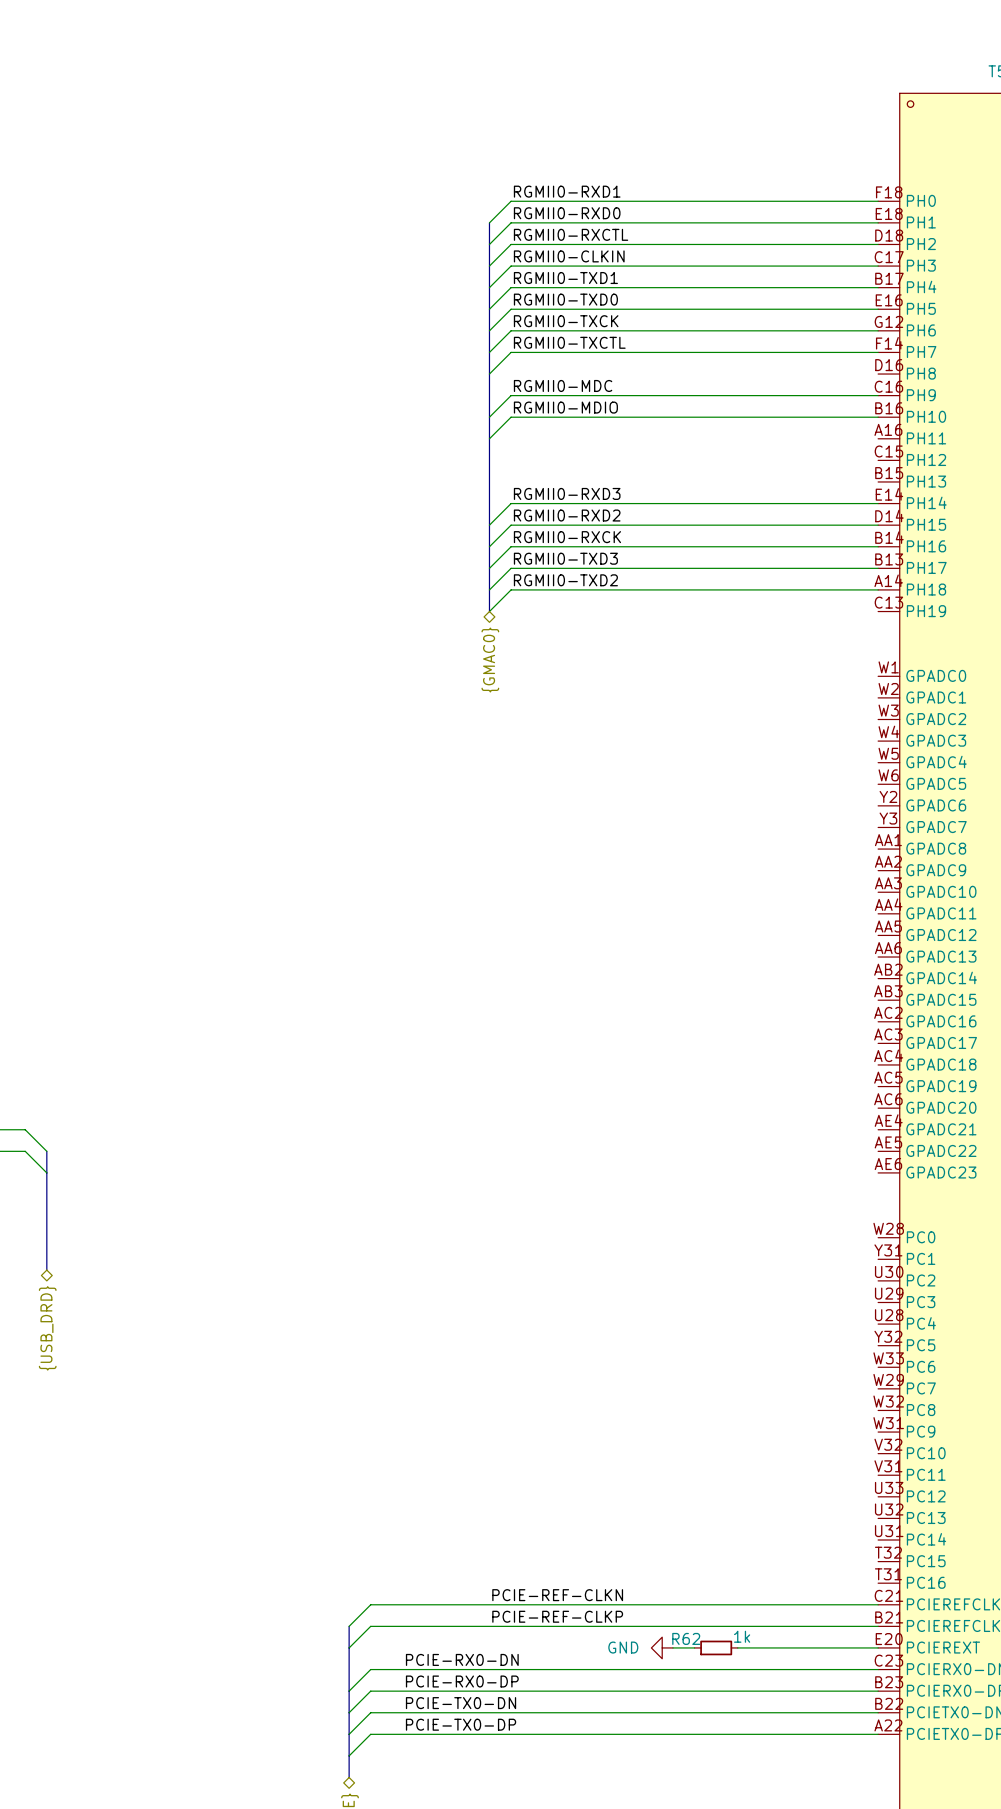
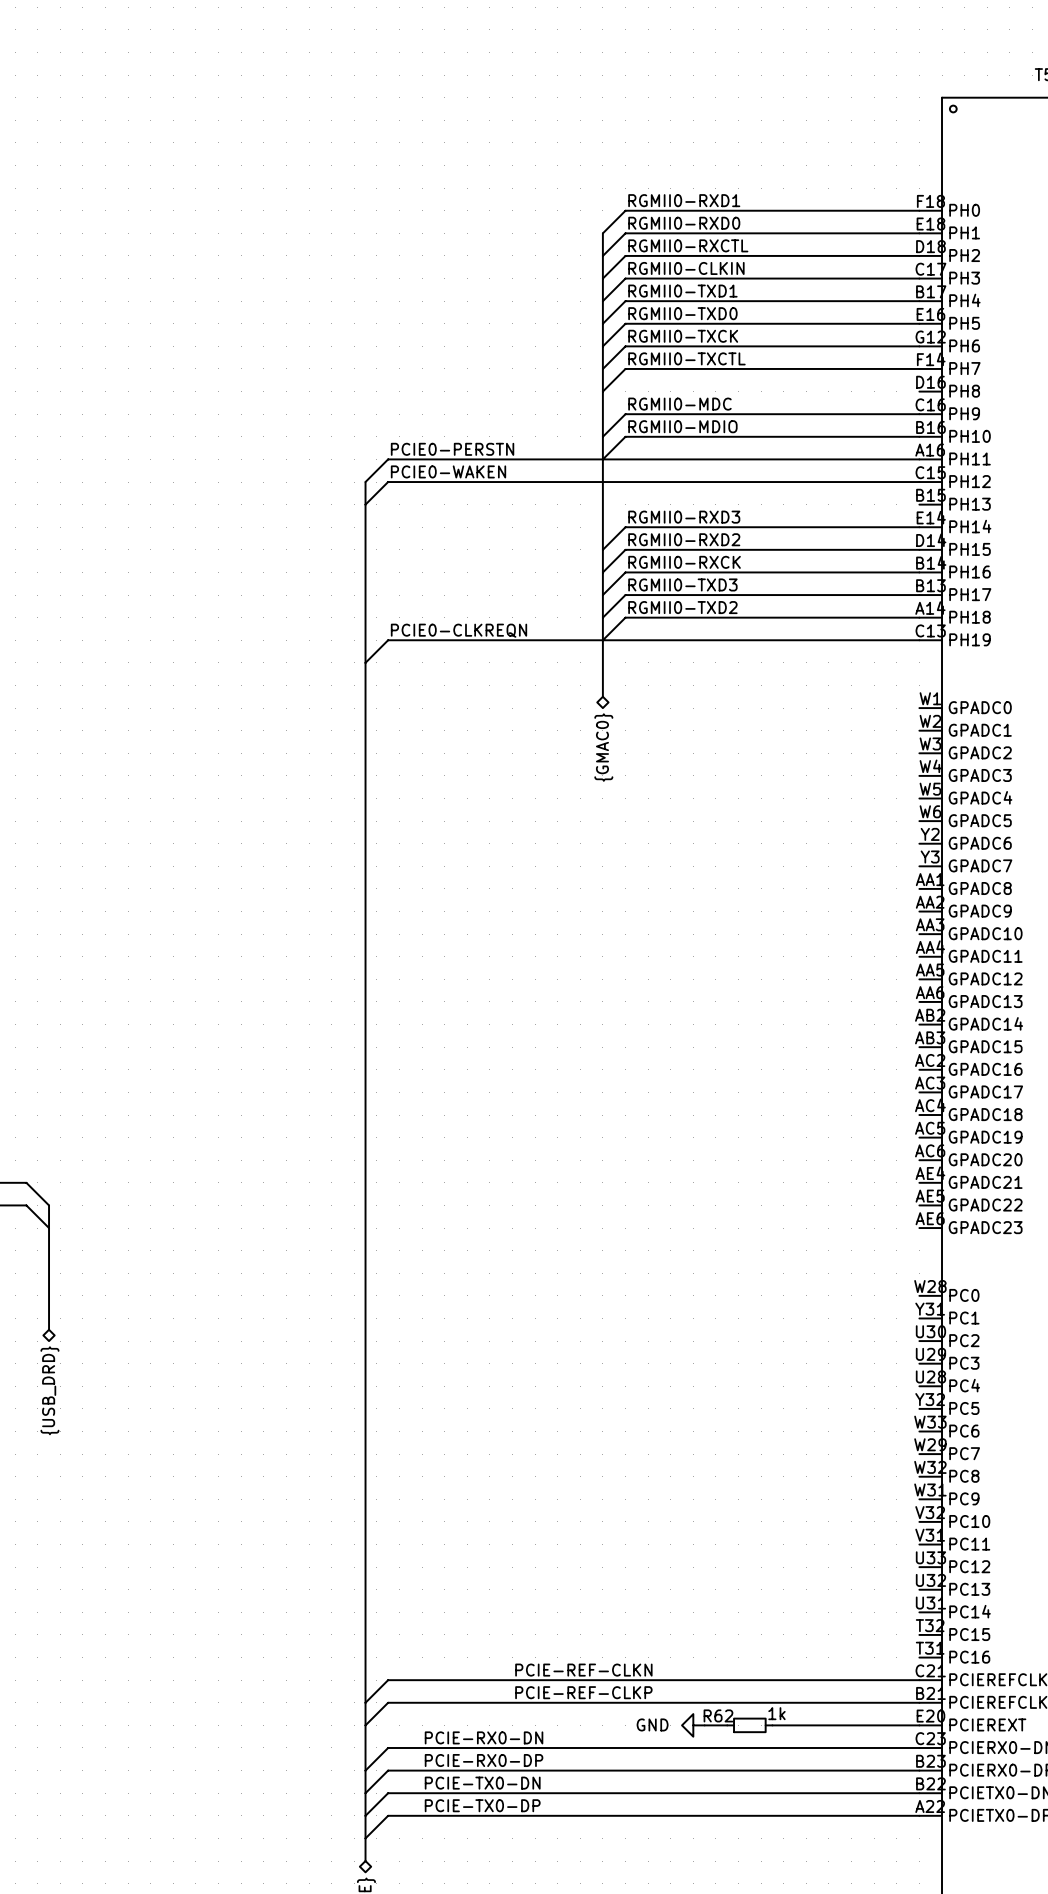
label position: RGMII0-RXD1 (567, 191) -> RGMII0-RXD1 (684, 200)
wire: (597, 201) (511, 201) (489, 222) -> (625, 210) (602, 233)
label position: RGMII0-RXD0 (567, 213) -> RGMII0-RXD0 (684, 223)
bus: (489, 222) (489, 611) -> none
bus: none -> (602, 233) (602, 696)
wire: (597, 222) (511, 222) (489, 244) -> (625, 233) (602, 255)
label position: RGMII0-RXCTL (571, 234) -> RGMII0-RXCTL (688, 245)
wire: (597, 244) (511, 244) (489, 266) -> (625, 255) (602, 278)
label position: RGMII0-CLKIN (569, 256) -> RGMII0-CLKIN (686, 268)
wire: (597, 266) (511, 266) (489, 287) -> (625, 278) (602, 301)
label position: RGMII0-TXD1 (565, 278) -> RGMII0-TXD1 (682, 291)
wire: (597, 287) (511, 287) (489, 309) -> (625, 301) (602, 323)
label position: RGMII0-TXD0 (565, 299) -> RGMII0-TXD0 (682, 313)
wire: (597, 309) (511, 309) (489, 330) -> (625, 323) (602, 346)
label position: RGMII0-TXCK (566, 321) -> RGMII0-TXCK (683, 336)
wire: (597, 330) (511, 330) (489, 352) -> (625, 346) (602, 368)
label position: RGMII0-TXCTL (569, 342) -> RGMII0-TXCTL (686, 358)
wire: (597, 352) (511, 352) (489, 374) -> (625, 368) (602, 391)
label position: RGMII0-MDC (563, 385) -> RGMII0-MDC (679, 404)
wire: (597, 395) (511, 395) (489, 417) -> (625, 414) (602, 436)
label position: RGMII0-MDIO (565, 407) -> RGMII0-MDIO (682, 426)
wire: (597, 417) (511, 417) (489, 438) -> (625, 436) (602, 459)
label: none -> PCIE0-PERSTN (452, 449)
wire: none -> (919, 459) (388, 459) (365, 482)
label: none -> PCIE0-WAKEN (448, 471)
bus: none -> (365, 482) (365, 1702)
wire: none -> (919, 482) (388, 482) (365, 504)
label position: RGMII0-RXD3 (567, 493) -> RGMII0-RXD3 (684, 517)
wire: (597, 503) (511, 503) (489, 525) -> (625, 527) (602, 549)
label position: RGMII0-RXD2 (567, 515) -> RGMII0-RXD2 (684, 539)
wire: (597, 525) (511, 525) (489, 546) -> (625, 549) (602, 572)
label position: RGMII0-RXCK (567, 537) -> RGMII0-RXCK (684, 562)
wire: (597, 546) (511, 546) (489, 568) -> (625, 572) (602, 595)
label position: RGMII0-TXD3 (565, 558) -> RGMII0-TXD3 (682, 584)
wire: (597, 568) (511, 568) (489, 589) -> (625, 595) (602, 617)
label position: RGMII0-TXD2 (565, 580) -> RGMII0-TXD2 (682, 607)
wire: (597, 589) (511, 589) (489, 611) -> (625, 617) (602, 640)
label: none -> PCIE0-CLKREQN (459, 630)
wire: none -> (919, 640) (388, 640) (365, 662)
hierarchical label position: {GMAC0} (490, 660) -> {GMAC0} (603, 747)

